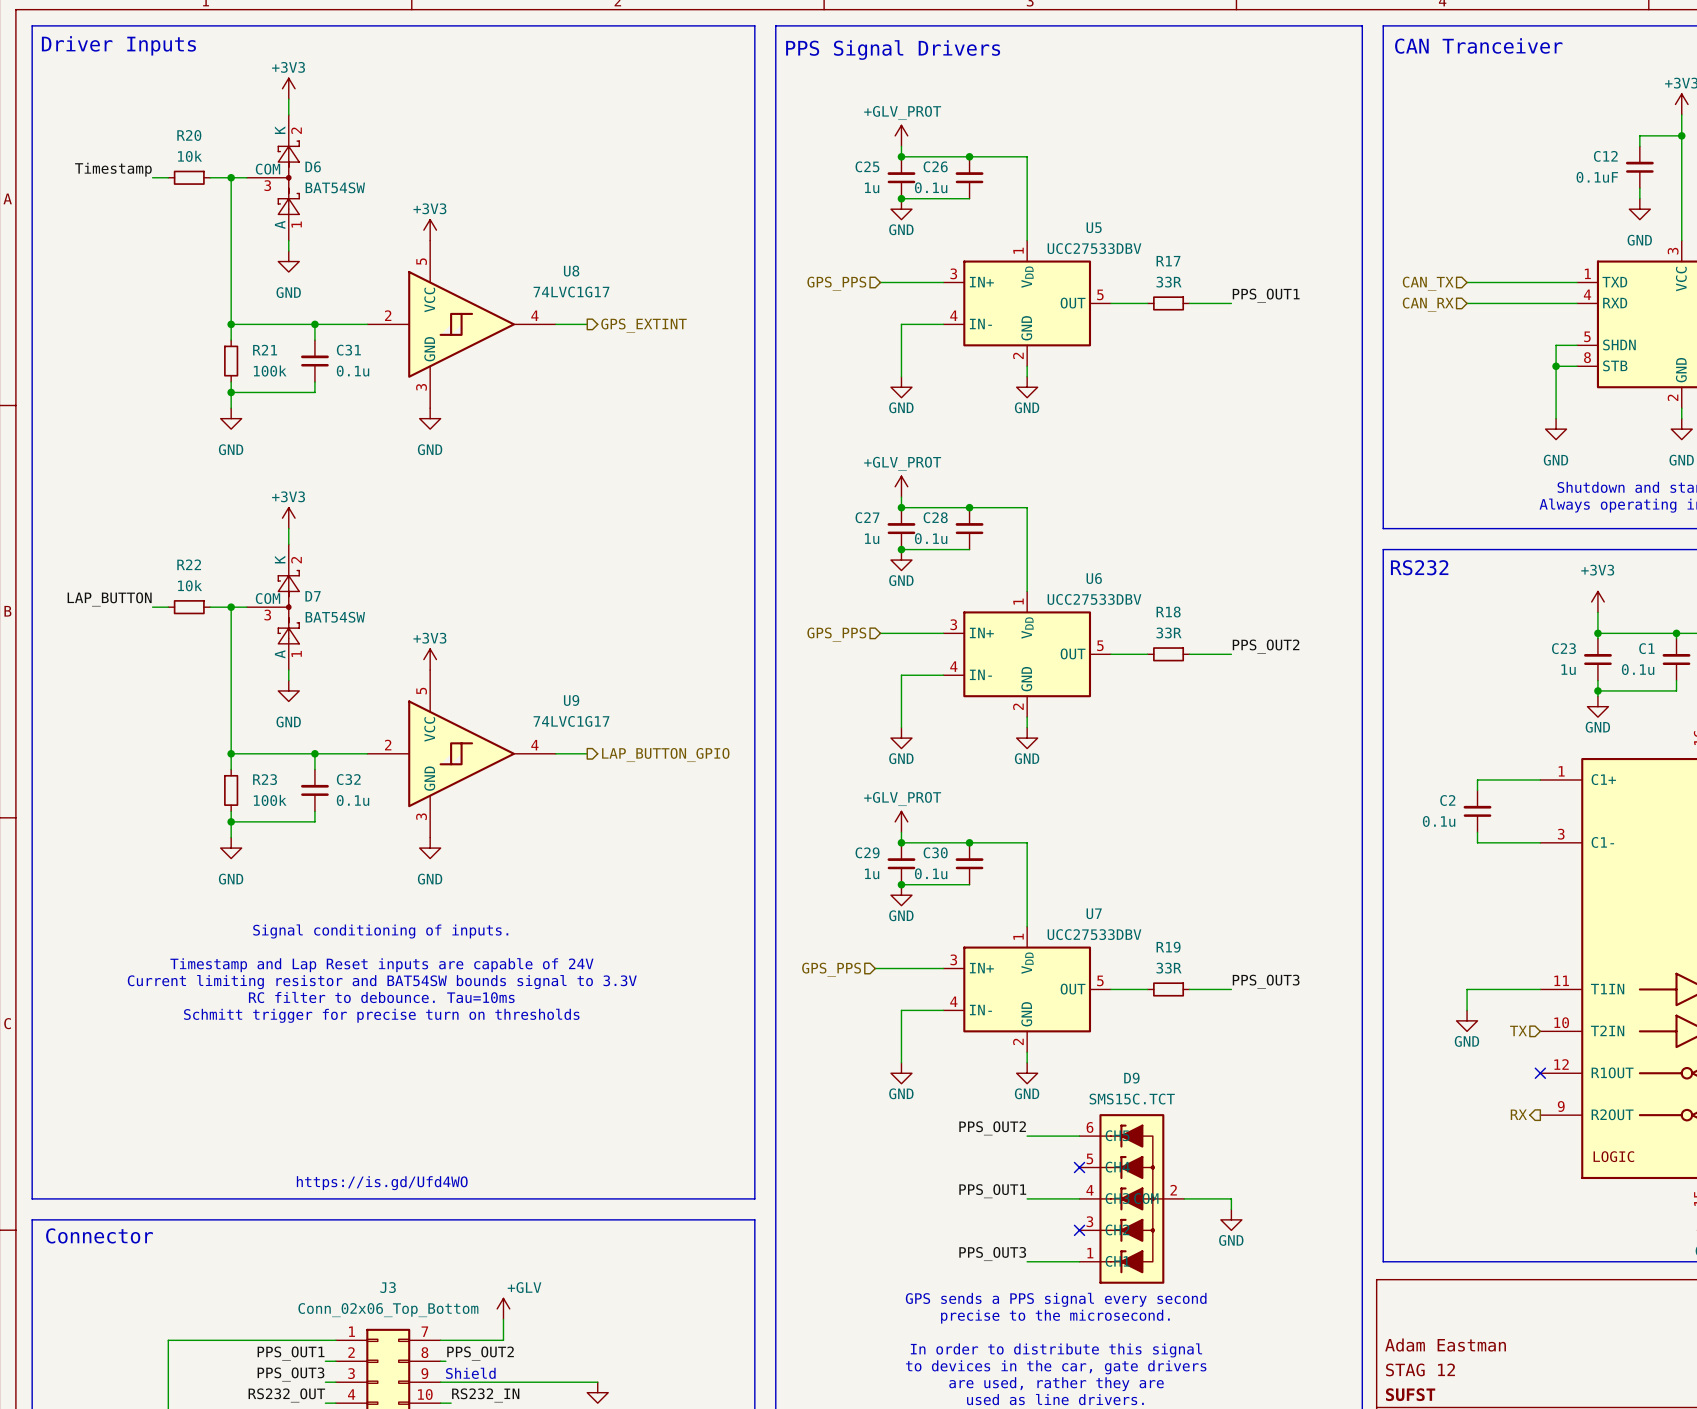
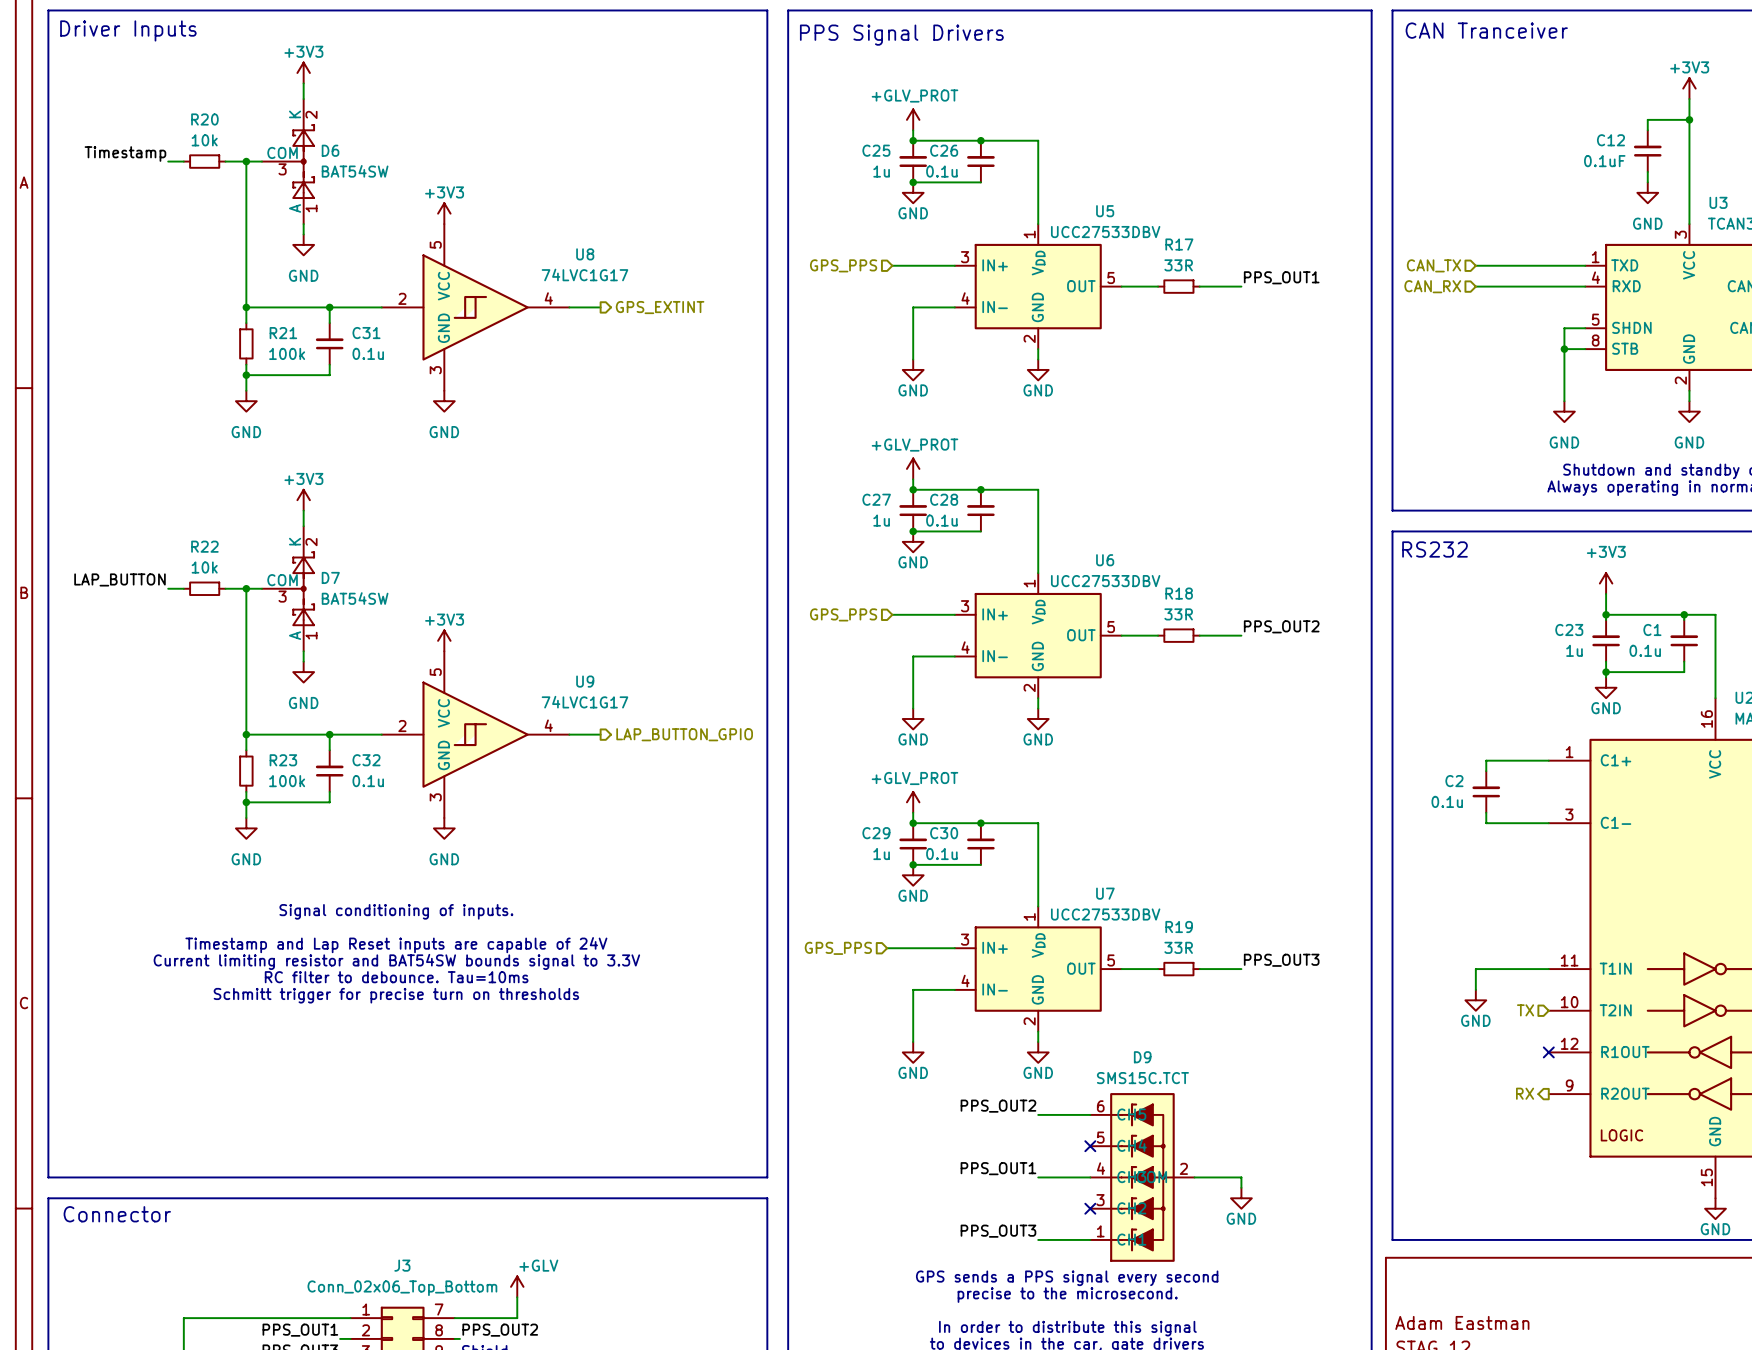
text: https://is.gd/Ufd4WO (382, 1183) -> none

